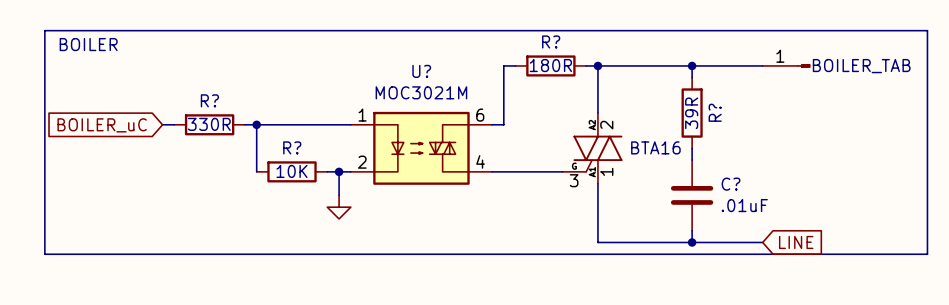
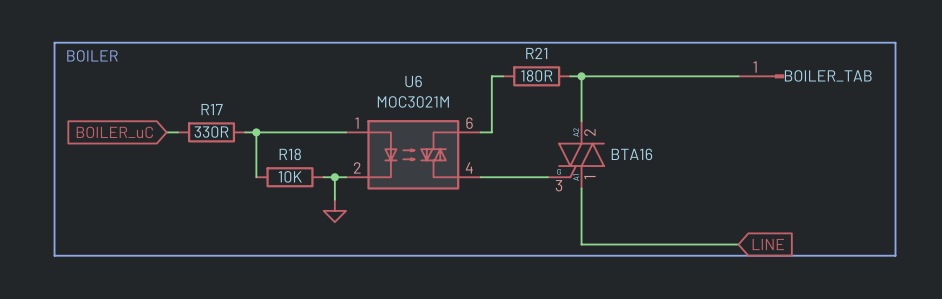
R? name: R? (551, 41) -> R21 (536, 53)
wire: (692, 65) (692, 77) -> none
junction: (692, 65) -> none
U? name: U? (421, 71) -> U6 (413, 81)
R? name: R? (209, 100) -> R17 (212, 109)
R?: 39R (692, 113) -> none
R? name: R? (292, 147) -> R18 (290, 154)
wire: (692, 148) (692, 160) -> none
C?: .01uF (692, 195) -> none
wire: (692, 230) (692, 242) -> none
junction: (692, 242) -> none

